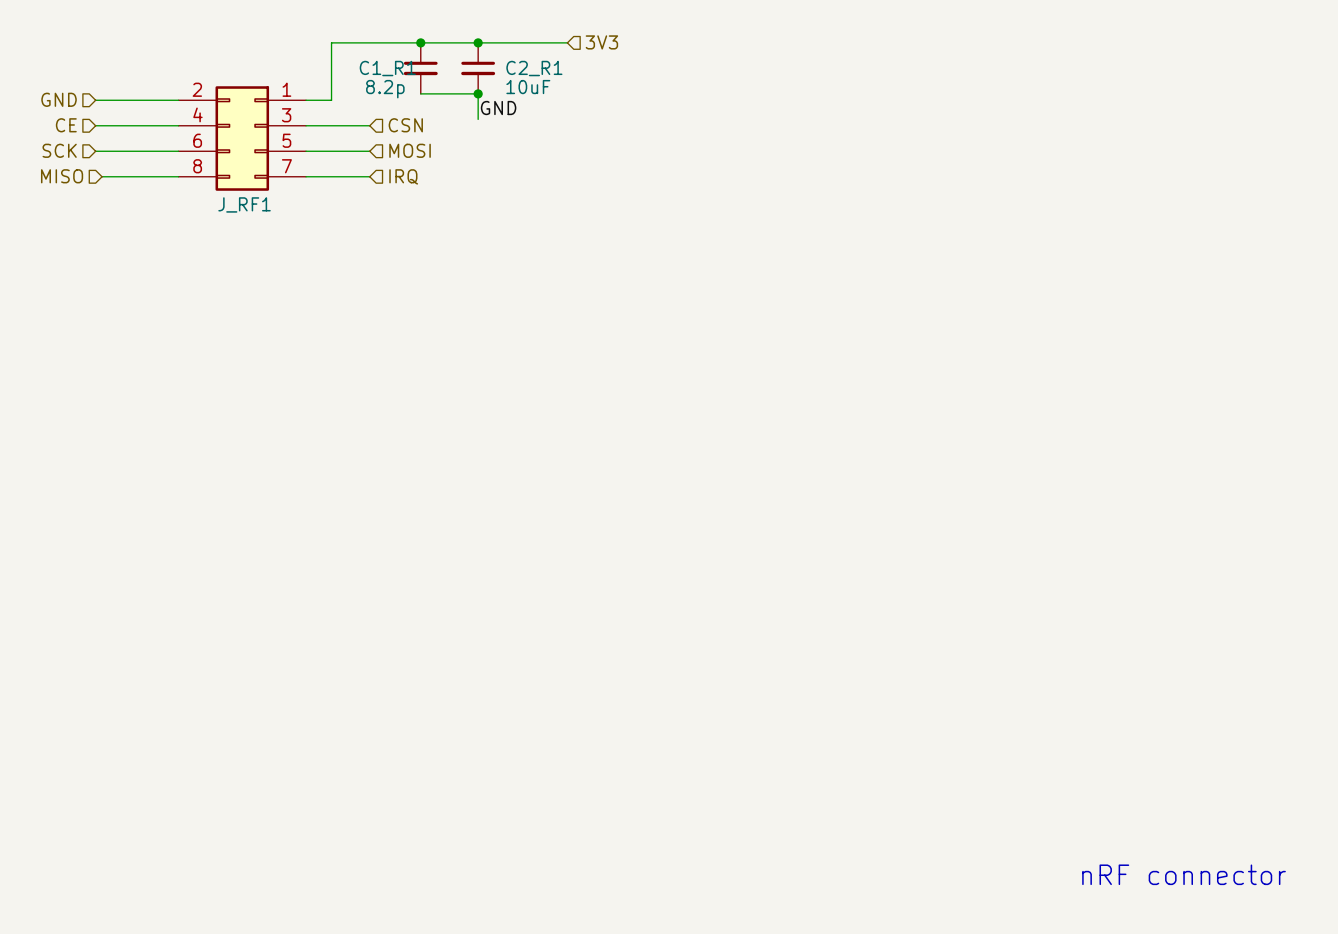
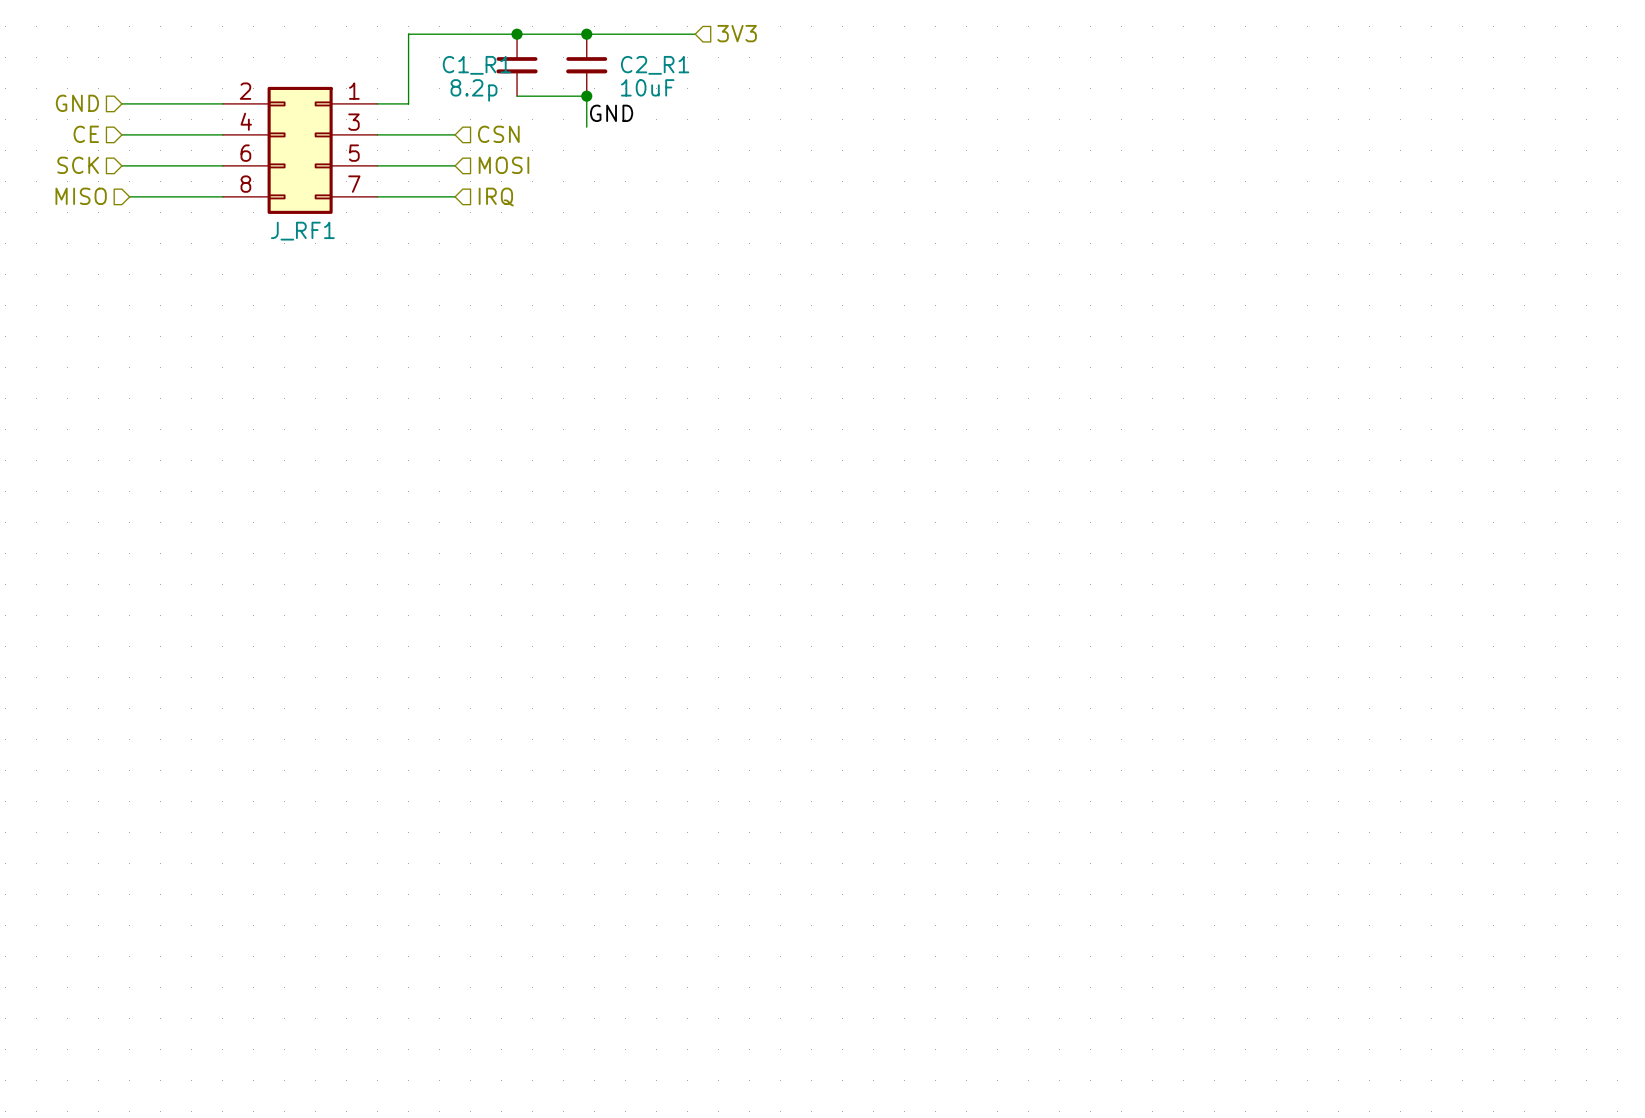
text: nRF connector (1184, 874) -> none

